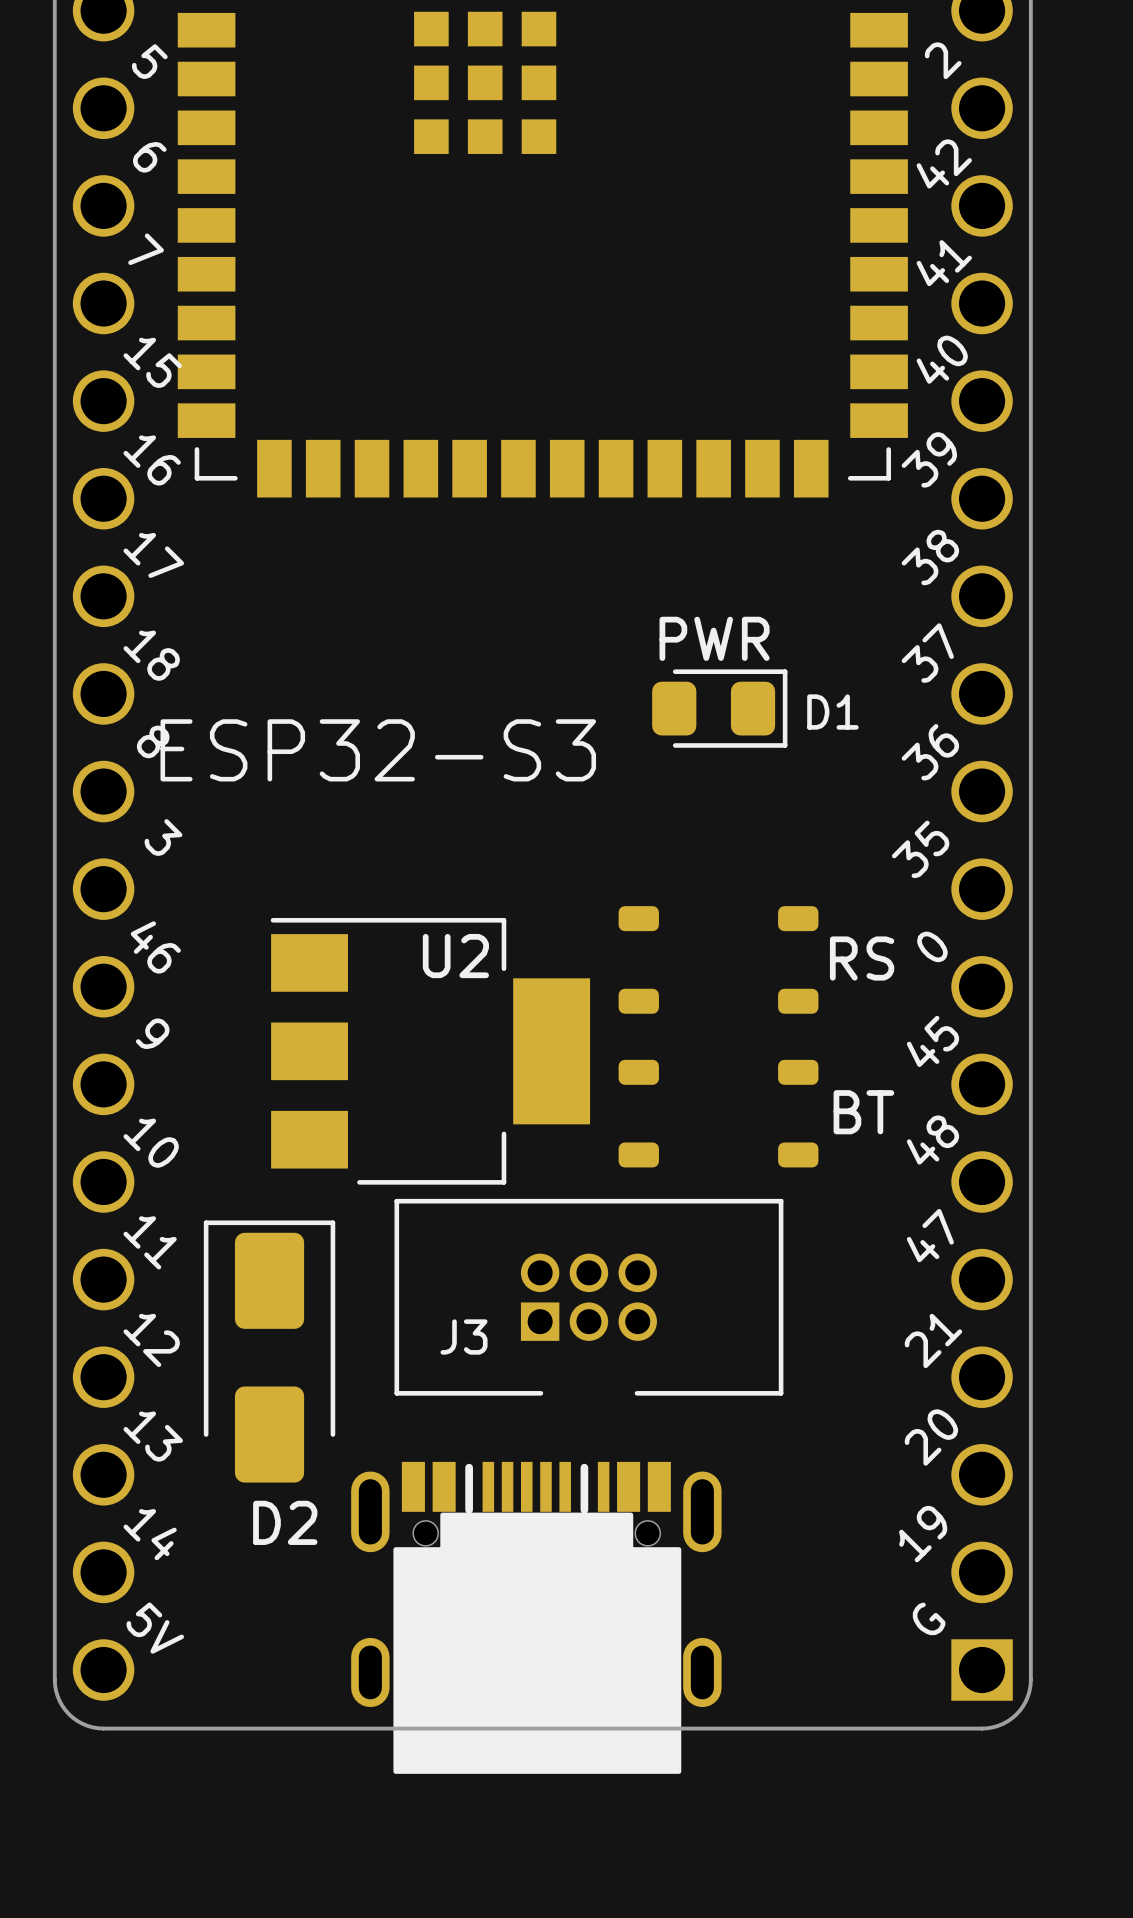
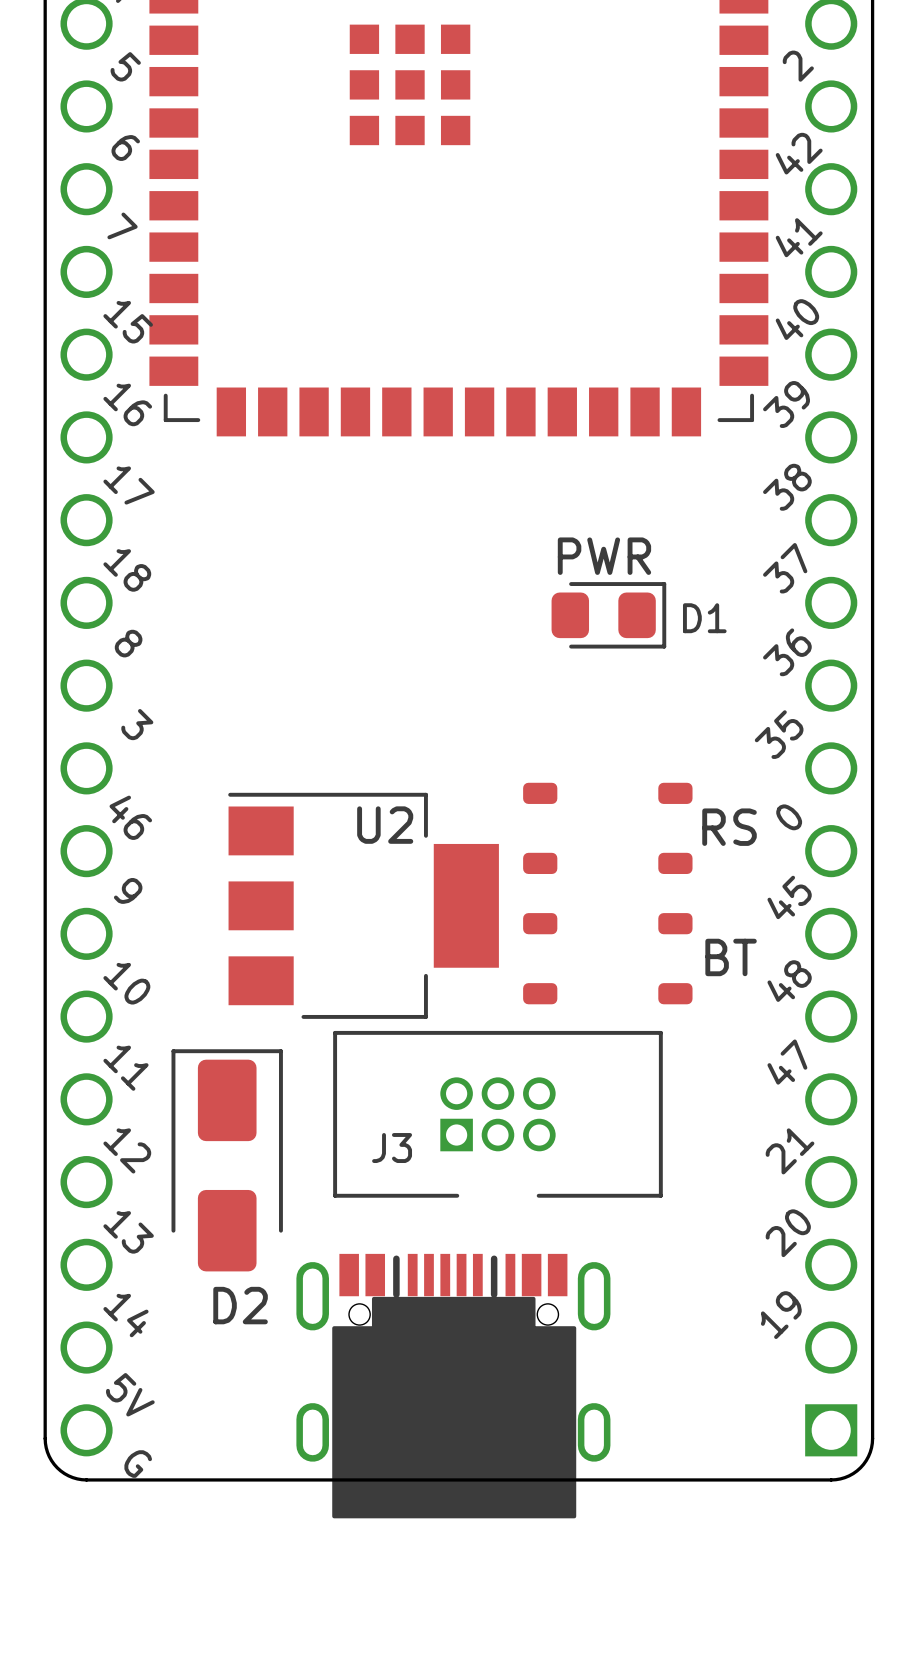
text: ESP32-S3 (378, 750) -> none
text rotation: 0° (929, 1618) -> 90° clockwise (138, 1464)
text position: G (929, 1618) -> G (138, 1464)

